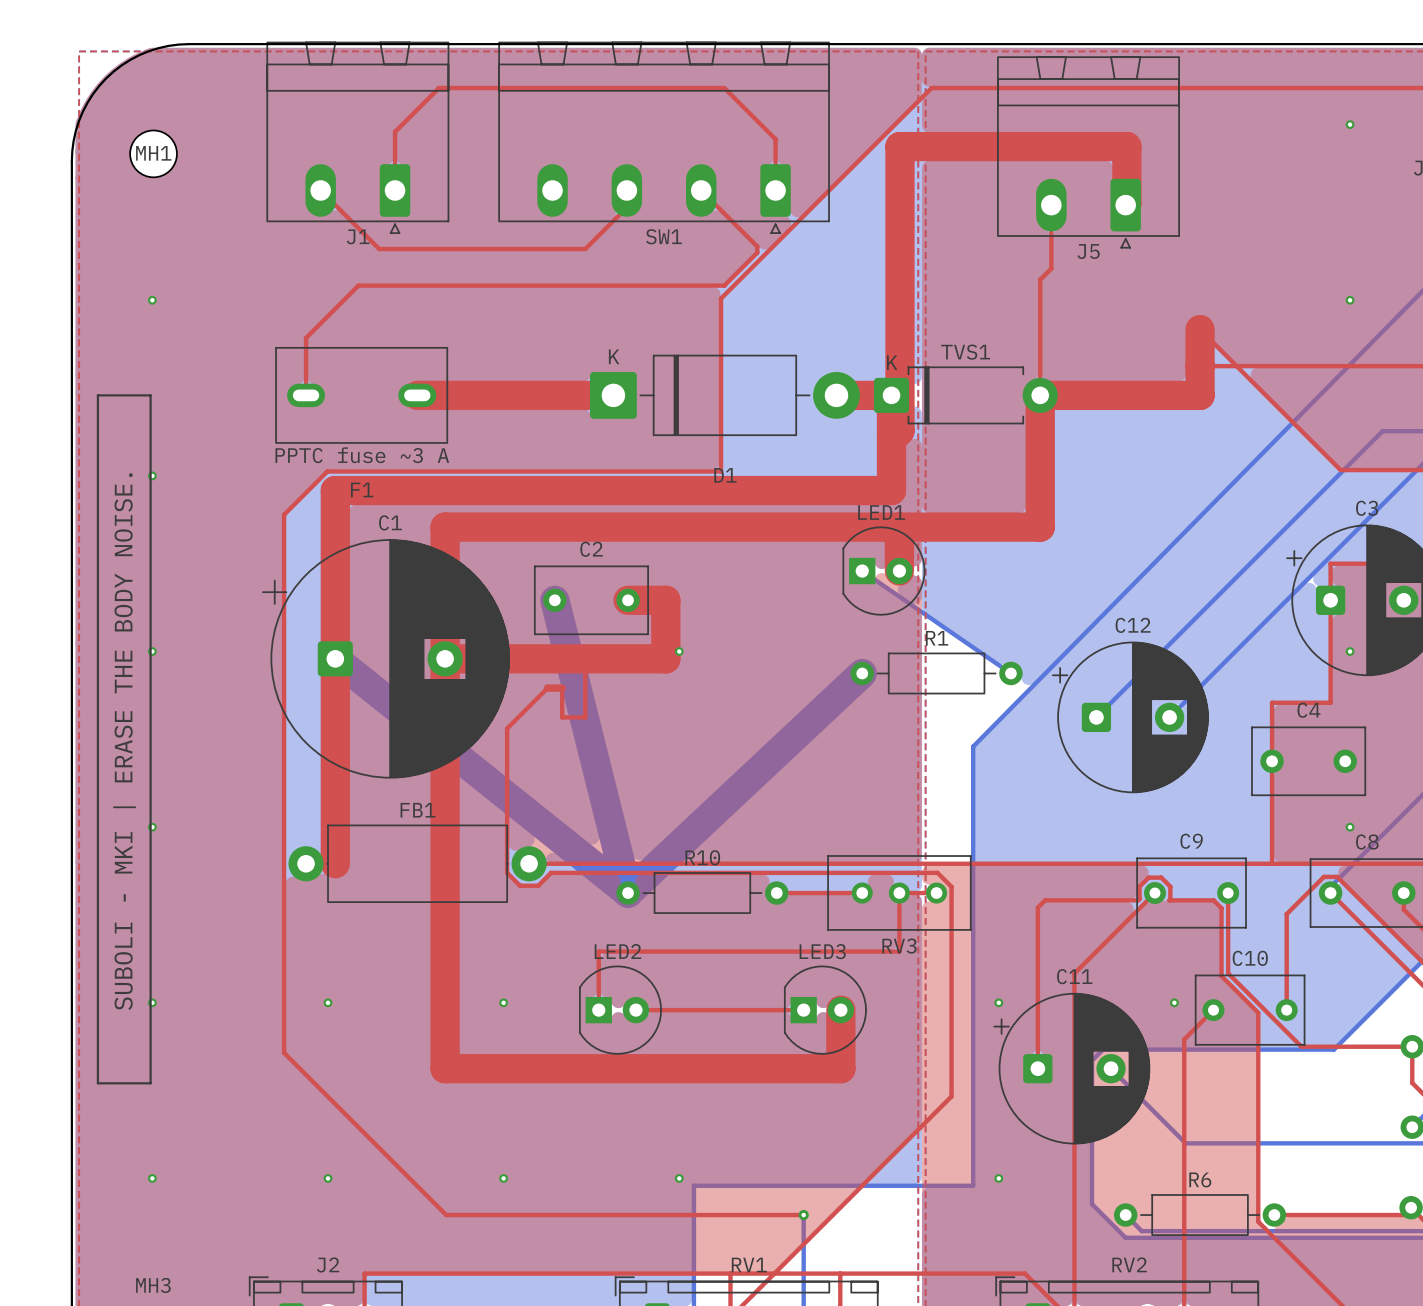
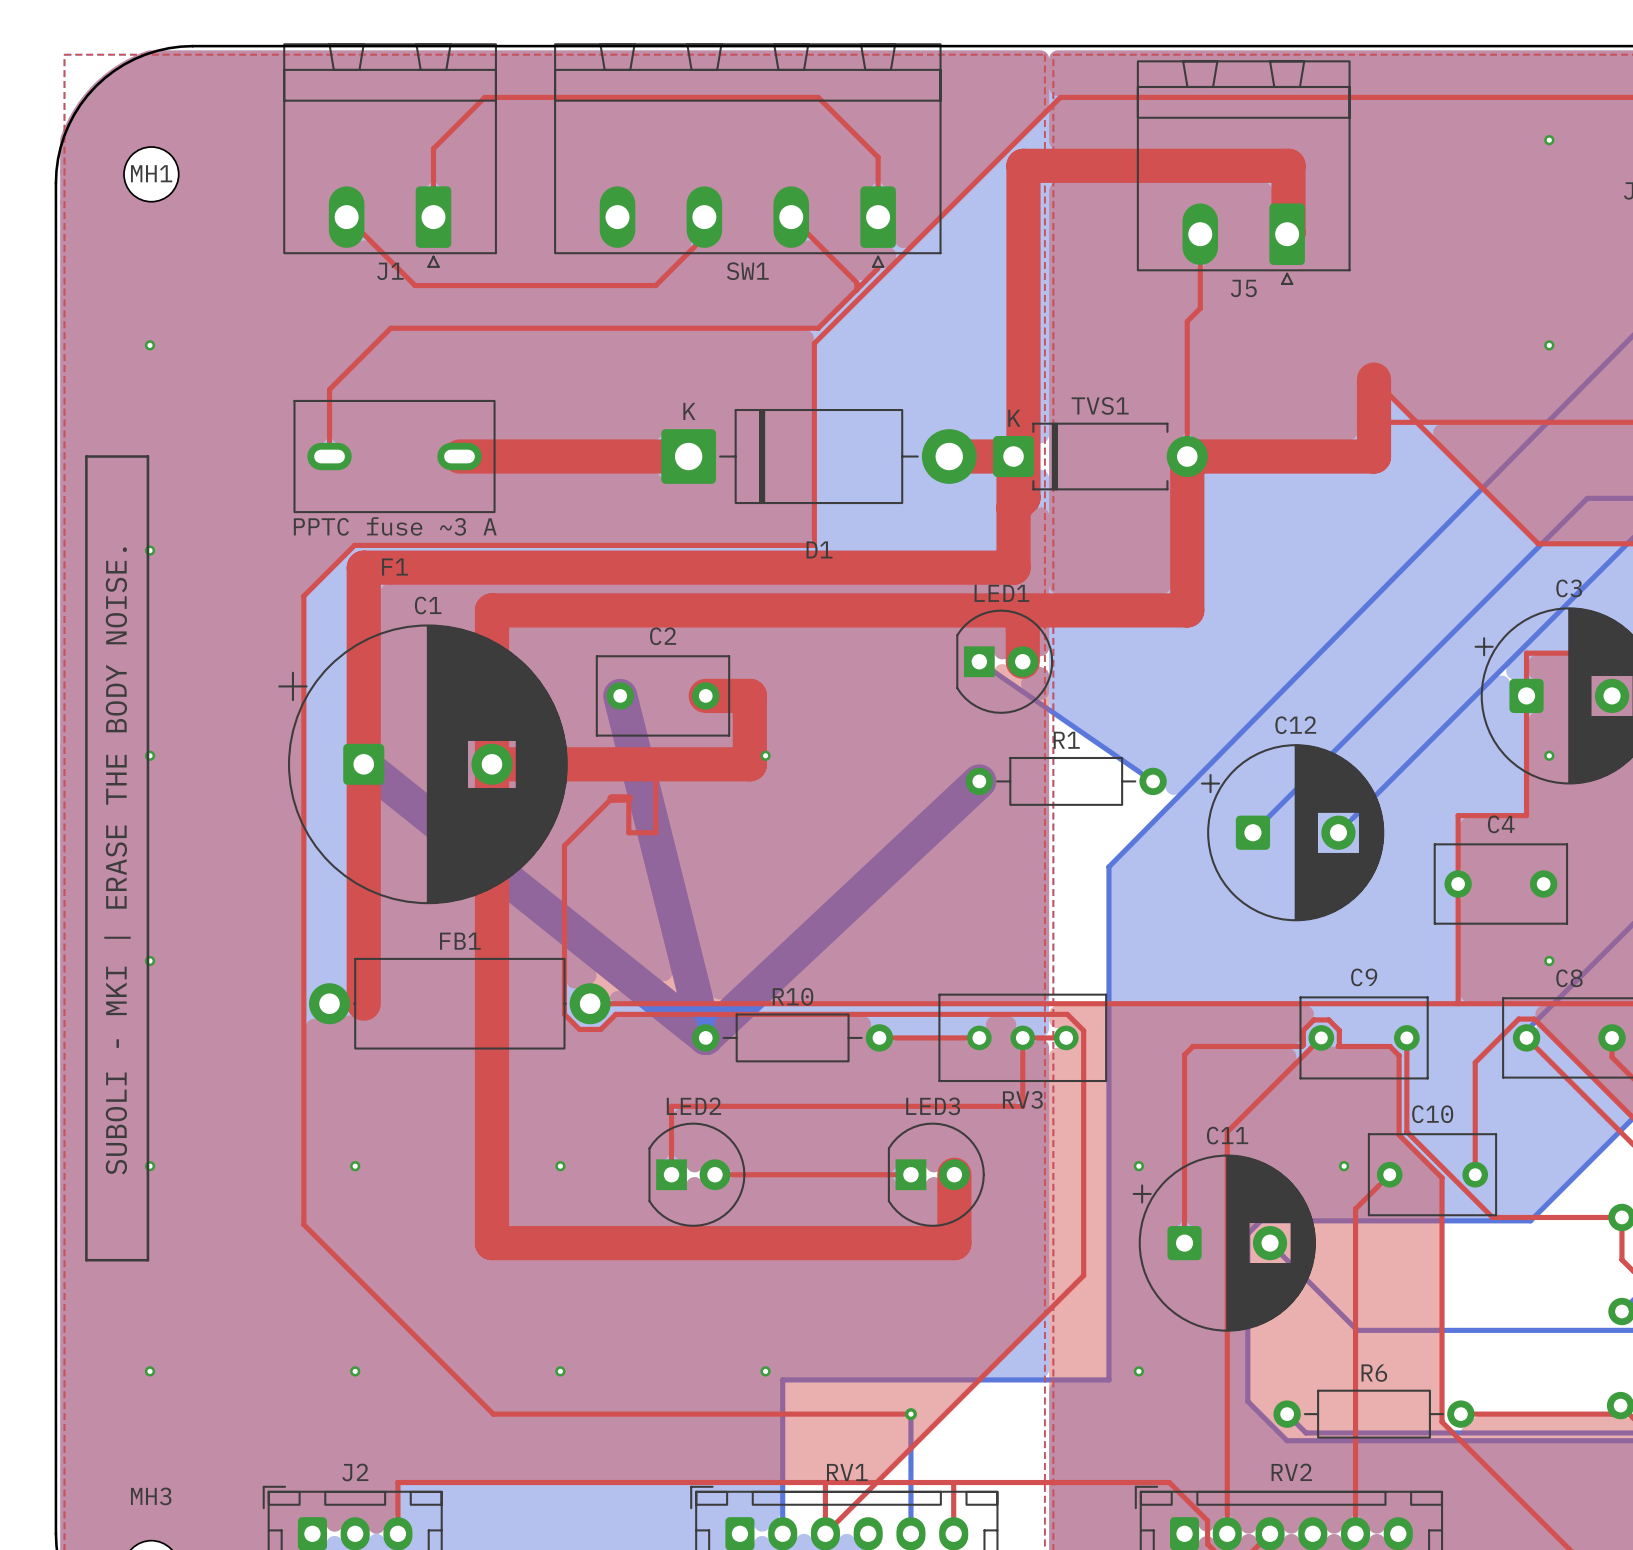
top track: none -> (878, 268) (856, 289)

